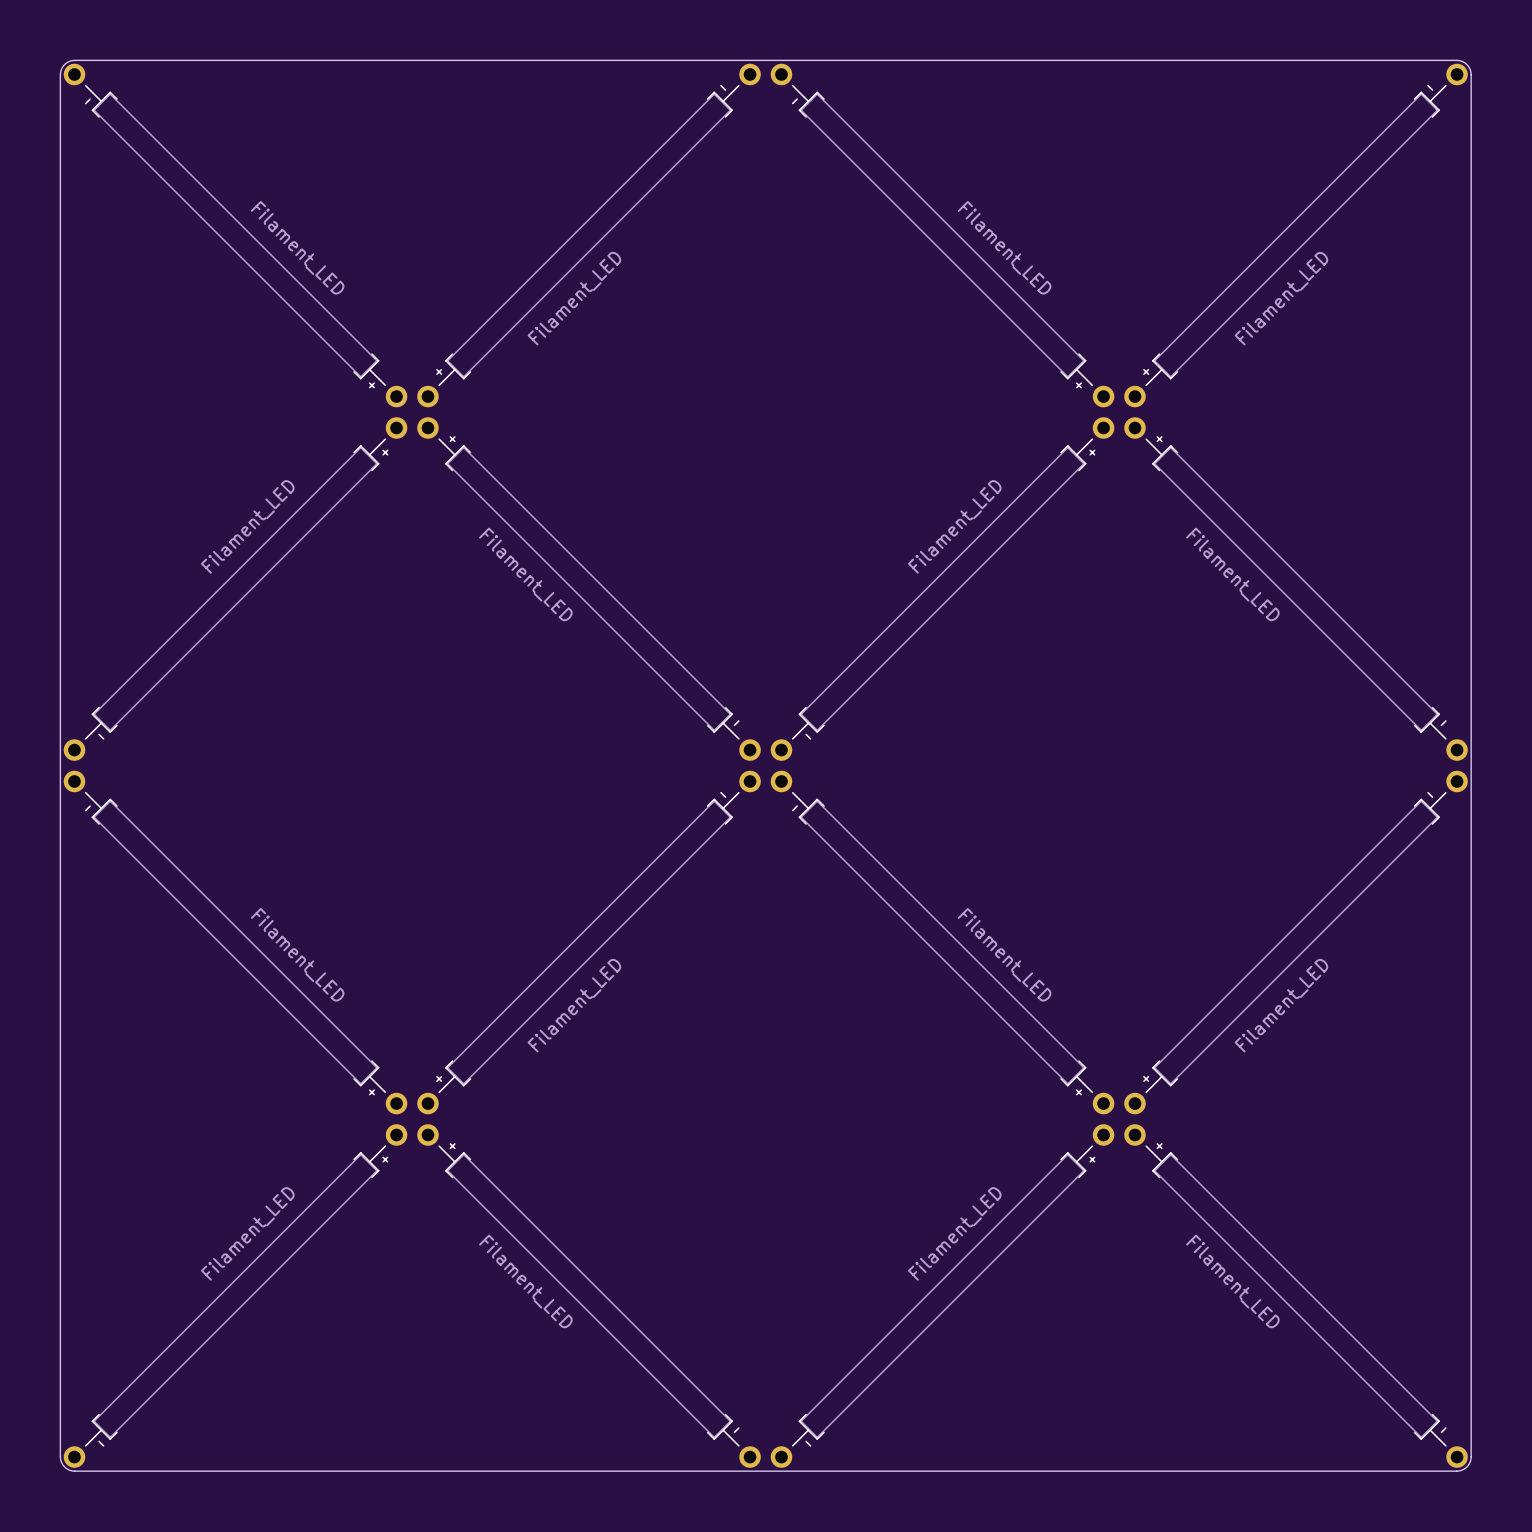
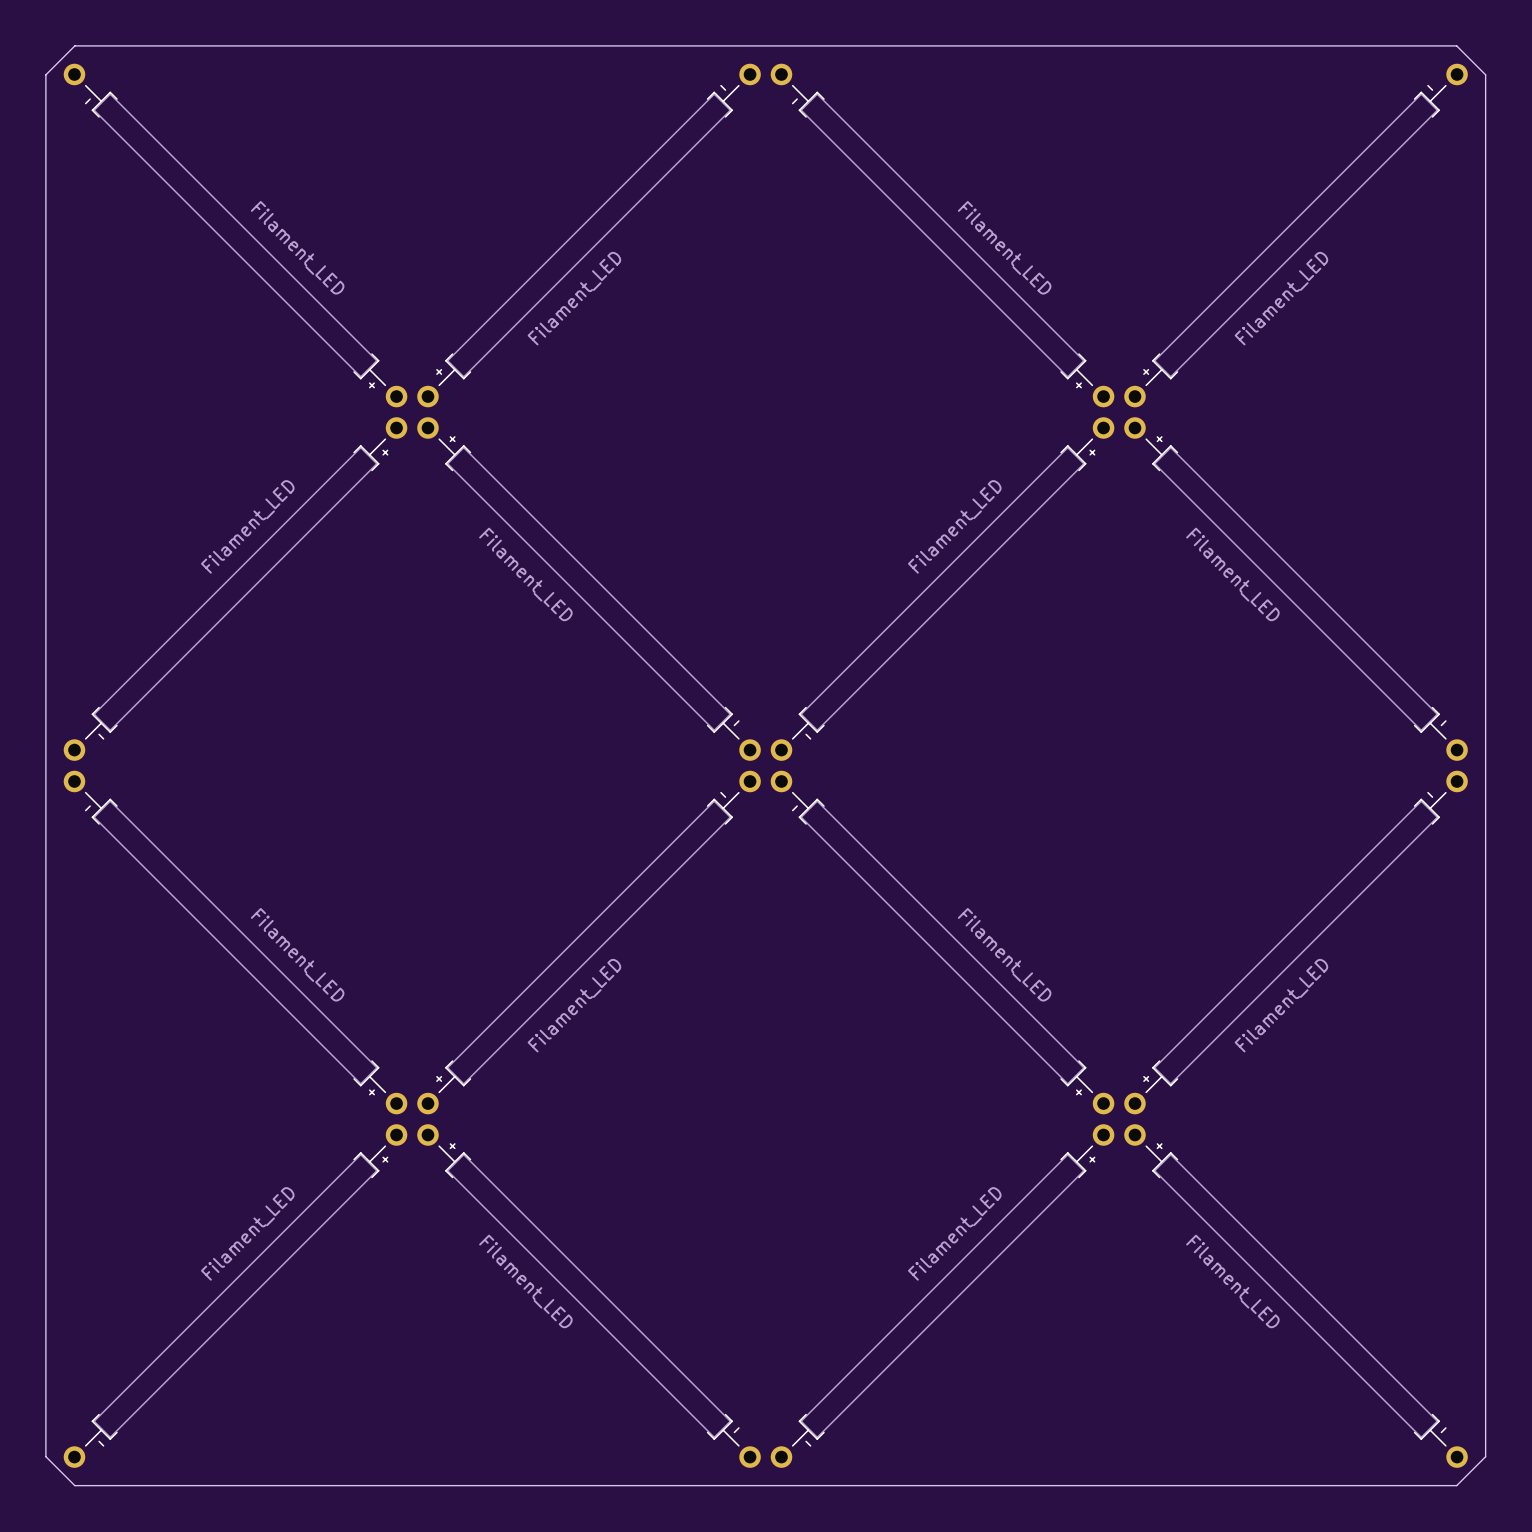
board edge: (74, 60) (1456, 60) (1466, 64) (1471, 74) (1471, 1456) (1466, 1466) (1456, 1471) (74, 1471) (64, 1466) (60, 1456) (60, 74) (64, 64) (74, 60) -> (74, 45) (45, 74) (45, 1456) (74, 1485) (1456, 1485) (1485, 1456) (1485, 74) (1456, 45) (74, 45)

